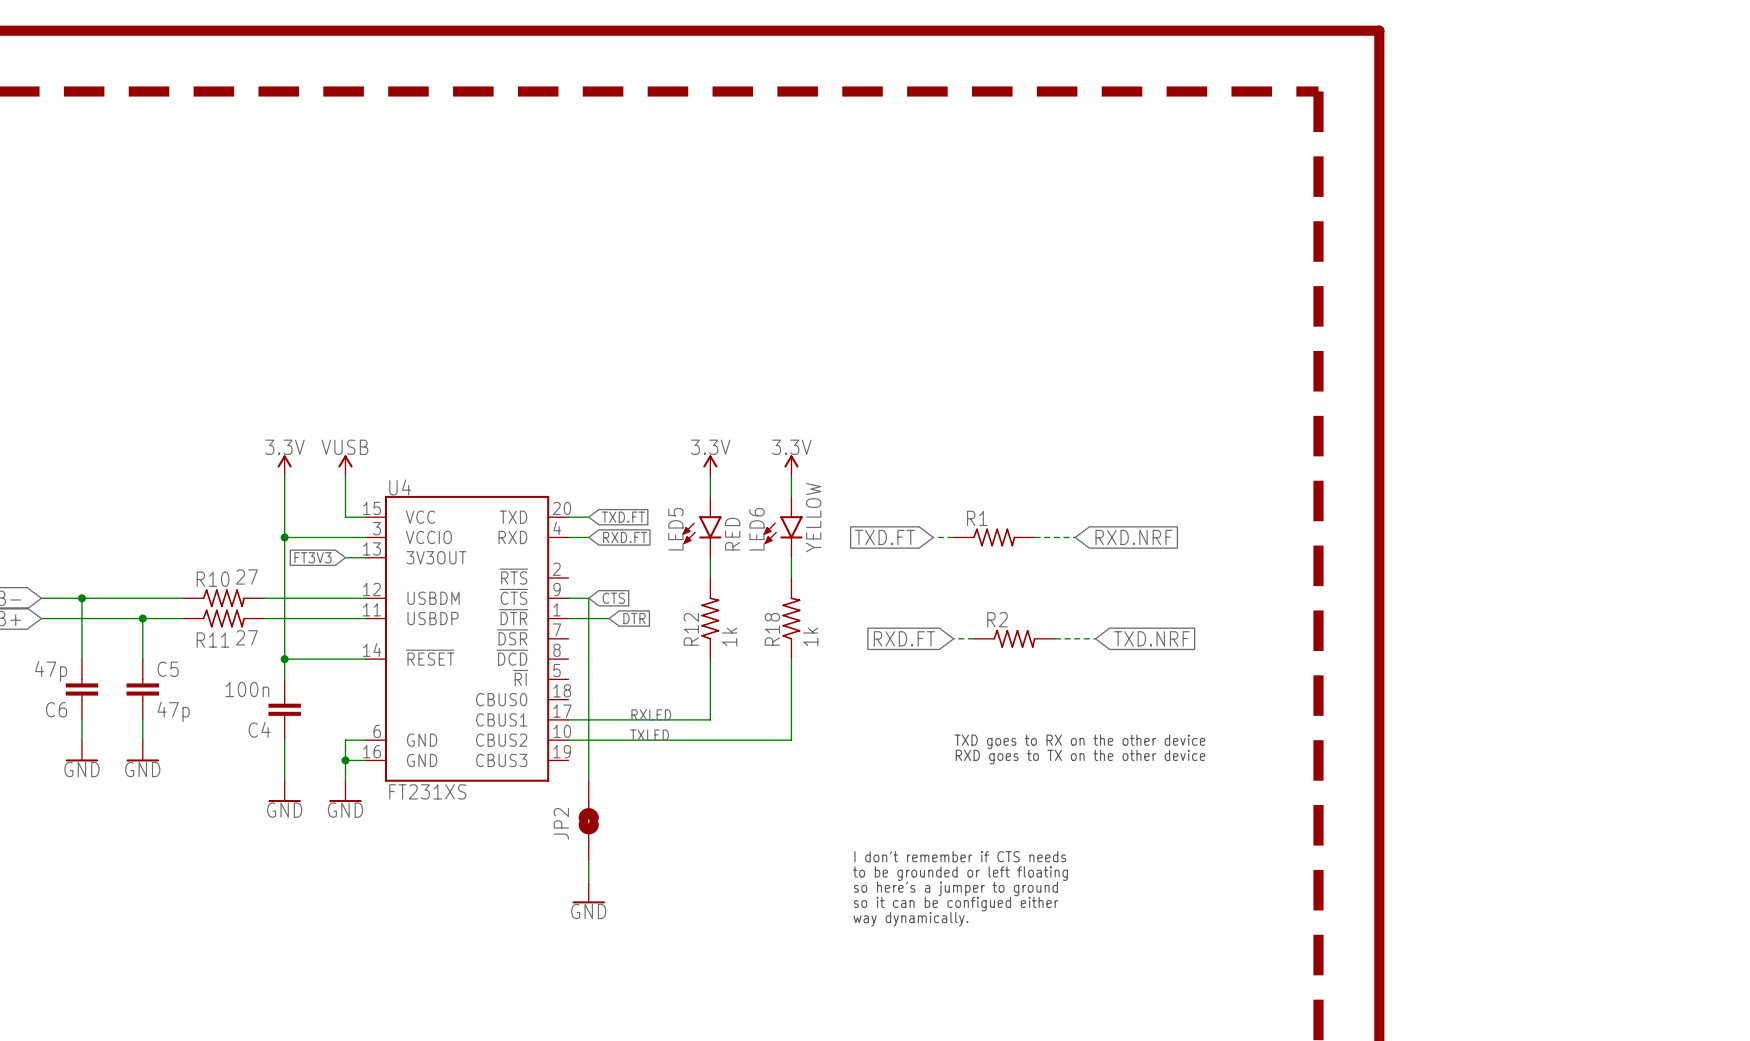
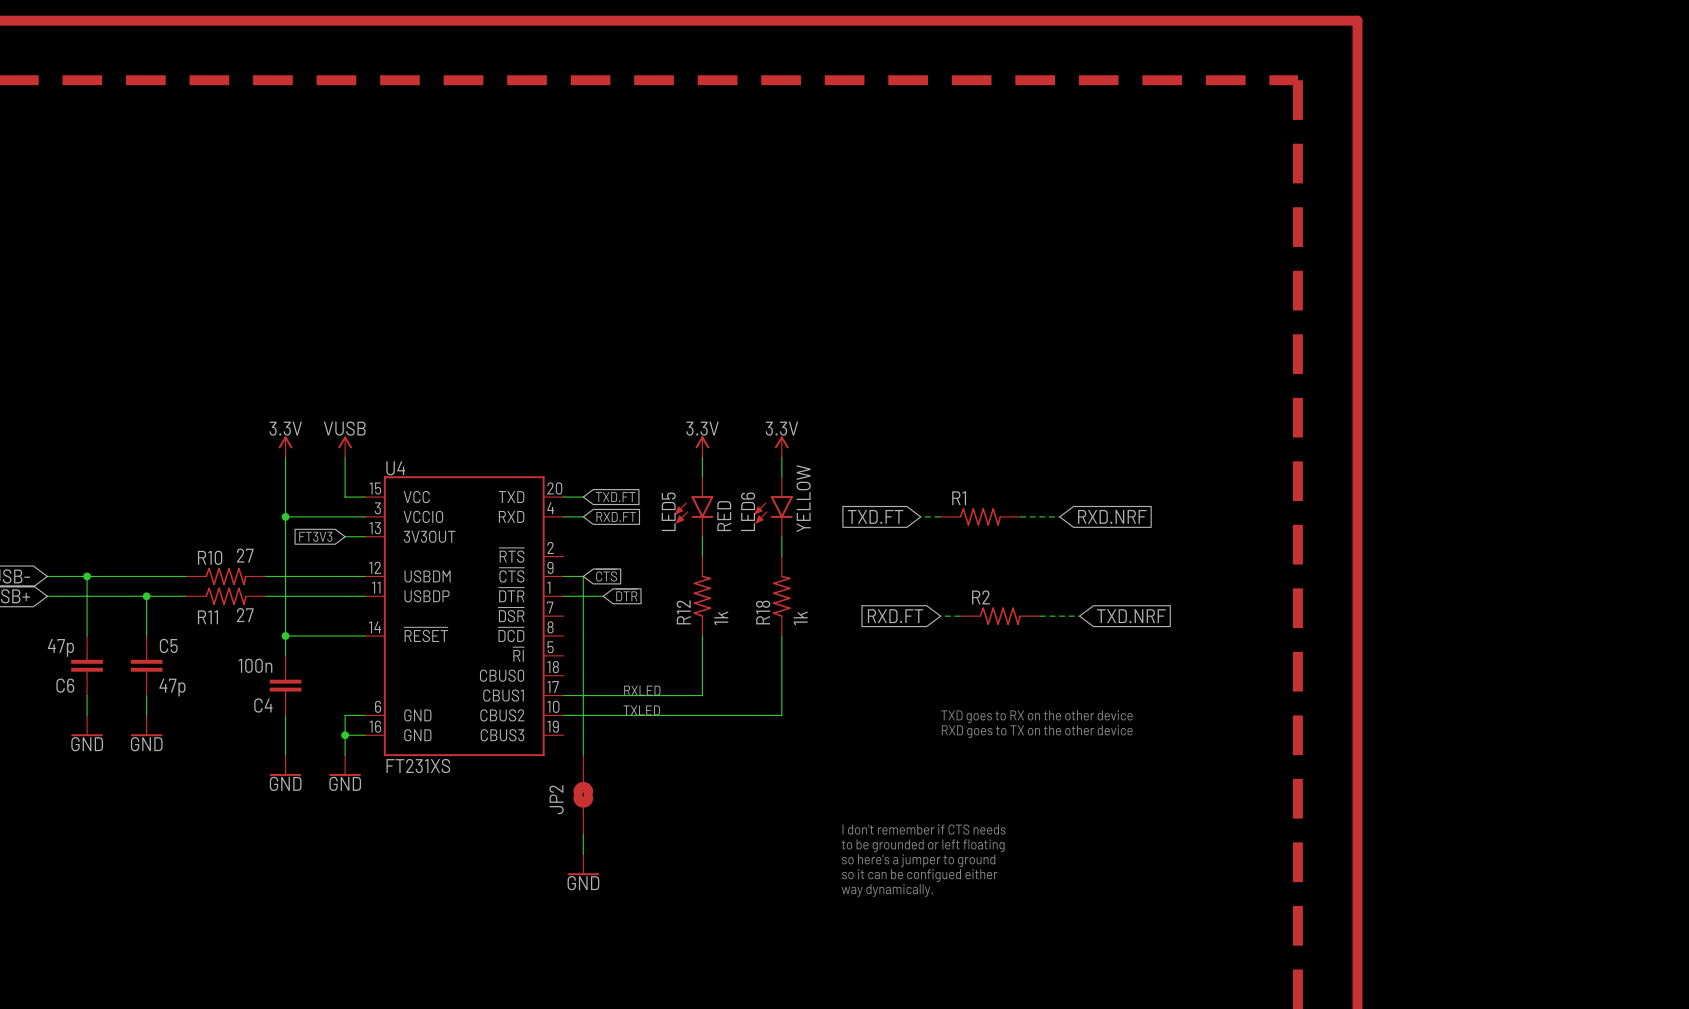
global label: CTS (613, 598) -> ~{CTS} (606, 575)
global label: DTR (634, 618) -> ~{DTR} (626, 595)

